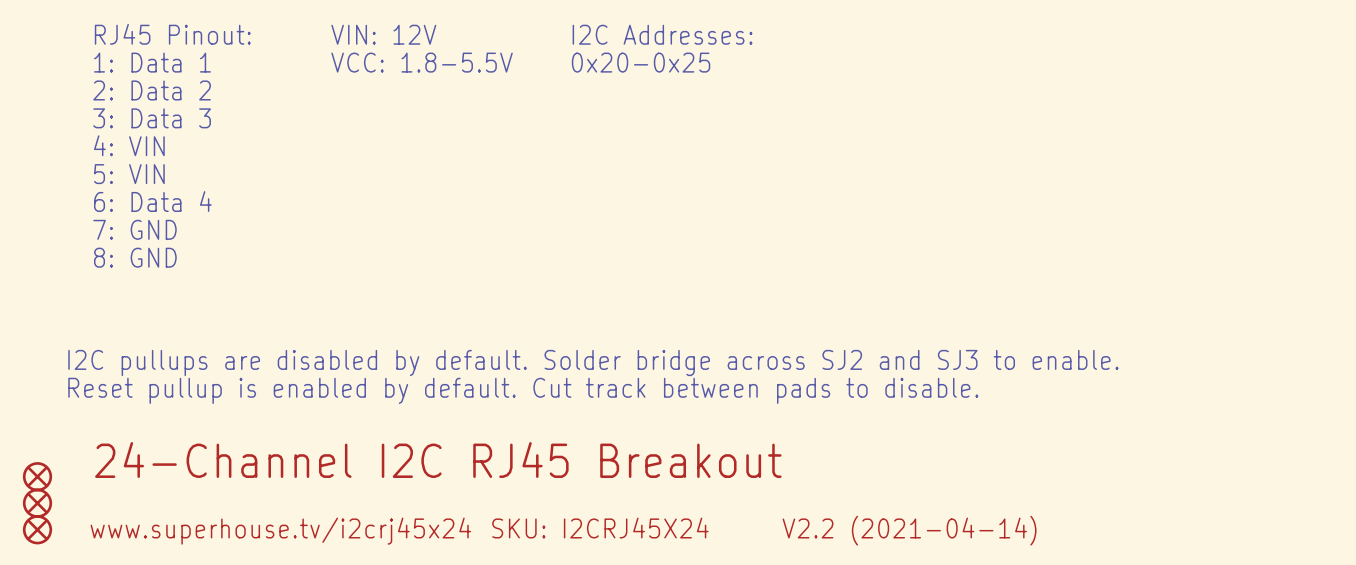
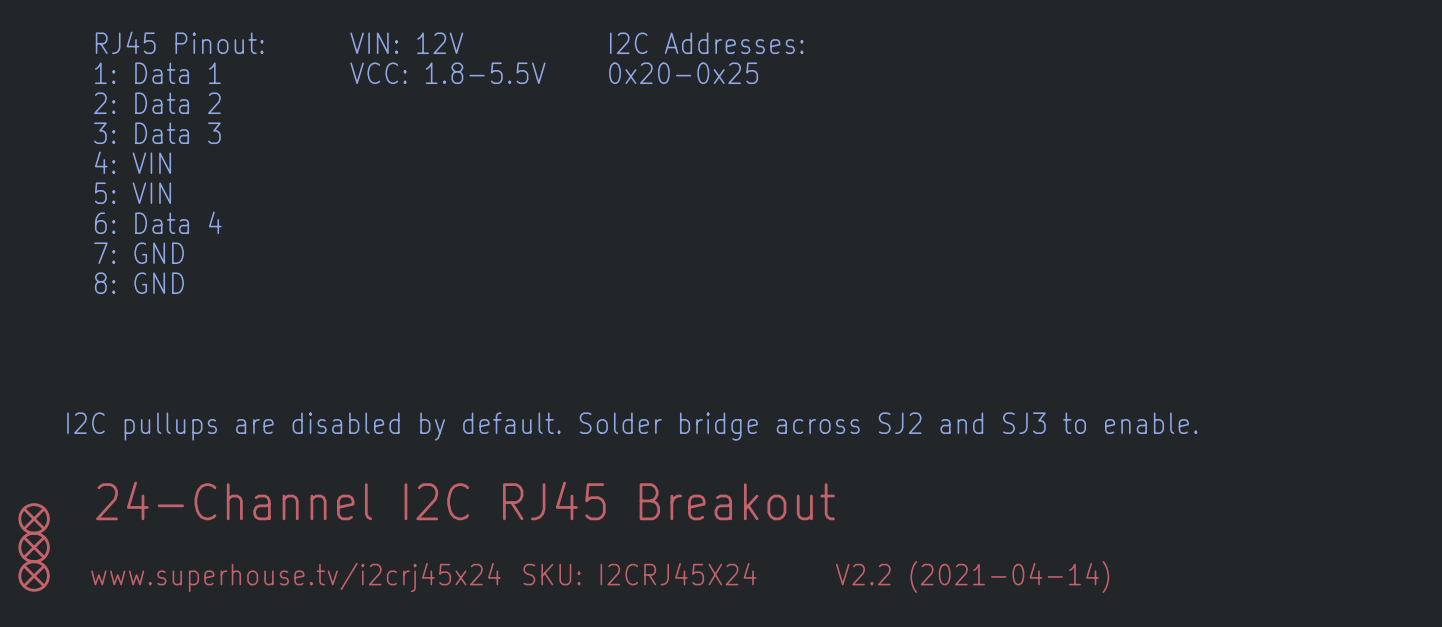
text: I2C pullups are disabled by default. Solder bridge across SJ2 and SJ3 to enable. (593, 363) -> none
text: Reset pullup is enabled by default. Cut track between pads to disable. (523, 390) -> I2C pullups are disabled by default. Solder bridge across SJ2 and SJ3 to enable. (632, 426)

